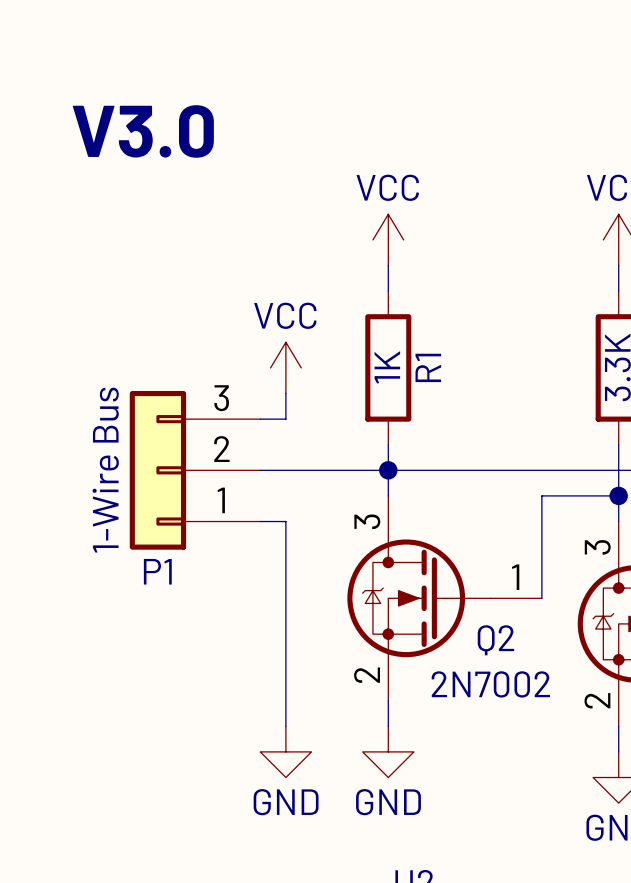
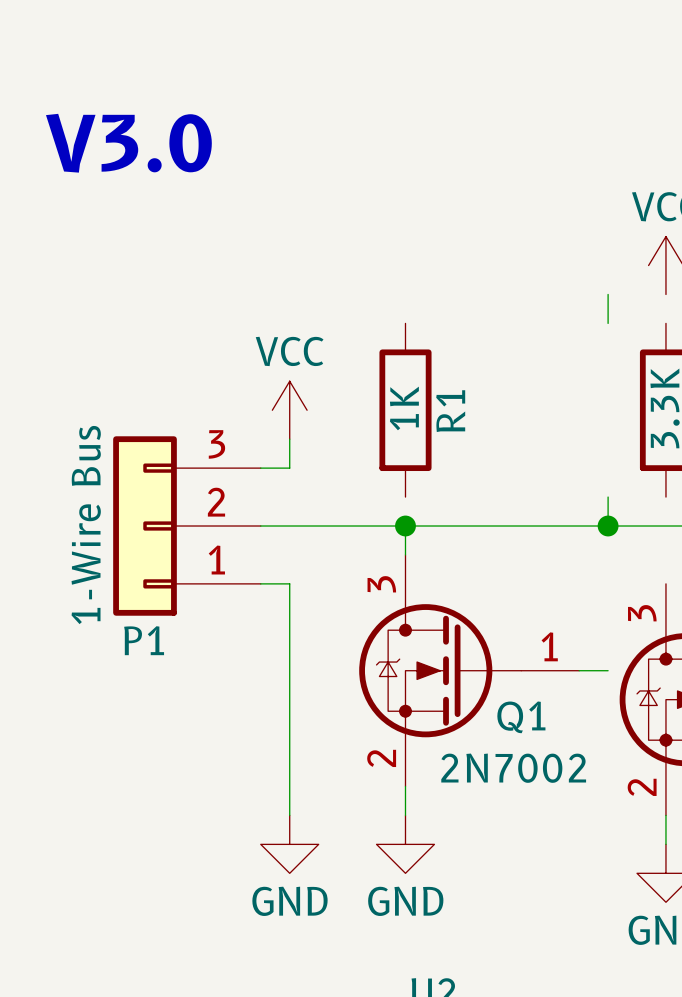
power symbol: VCC (388, 239) -> none
wire: (388, 265) (388, 291) -> (608, 294) (608, 323)
wire: (618, 265) (618, 291) -> none
wire: (388, 444) (388, 470) -> (608, 497) (608, 526)
wire: (618, 444) (618, 521) -> none
wire: (618, 495) (541, 495) (541, 598) -> (608, 670) (579, 670)
junction position: (618, 495) -> (608, 526)
Q2 name: Q2 (495, 640) -> Q1 (521, 717)

